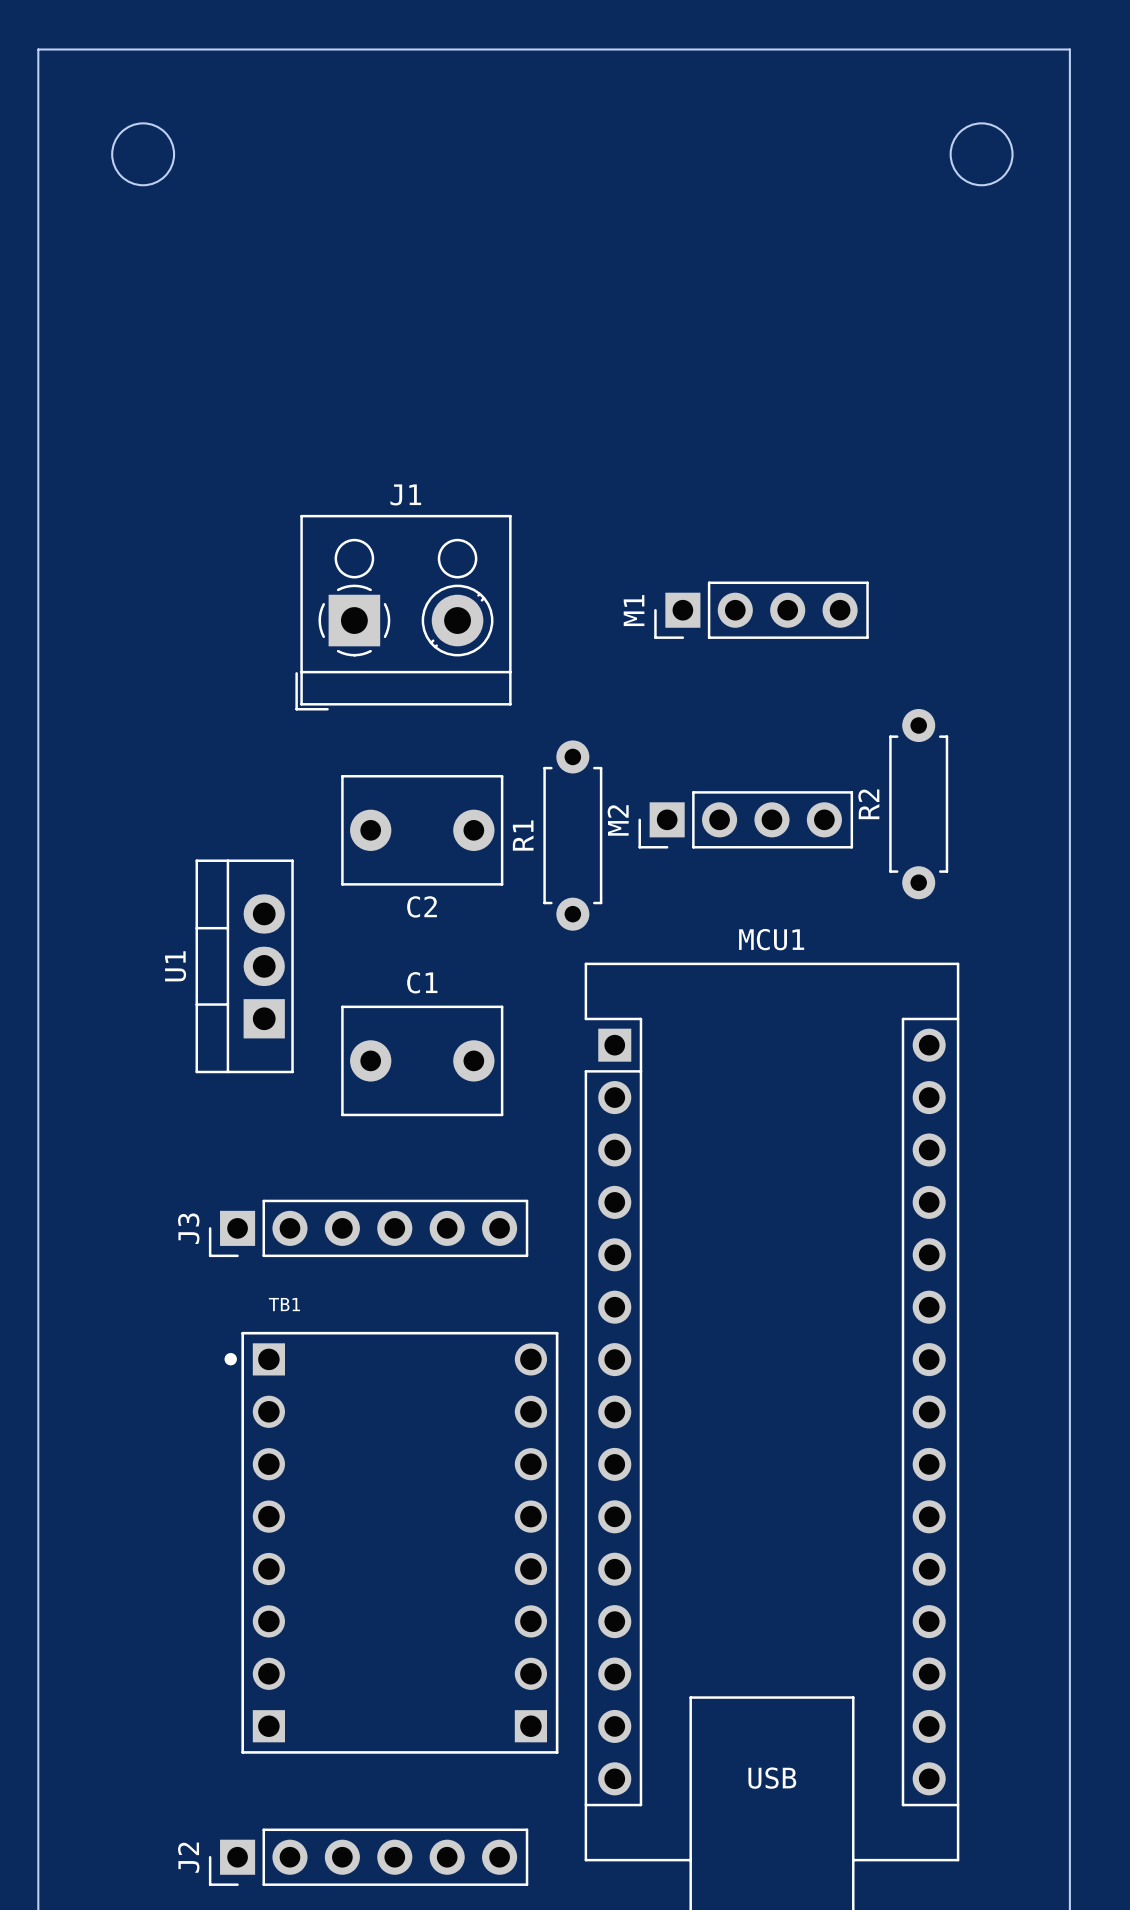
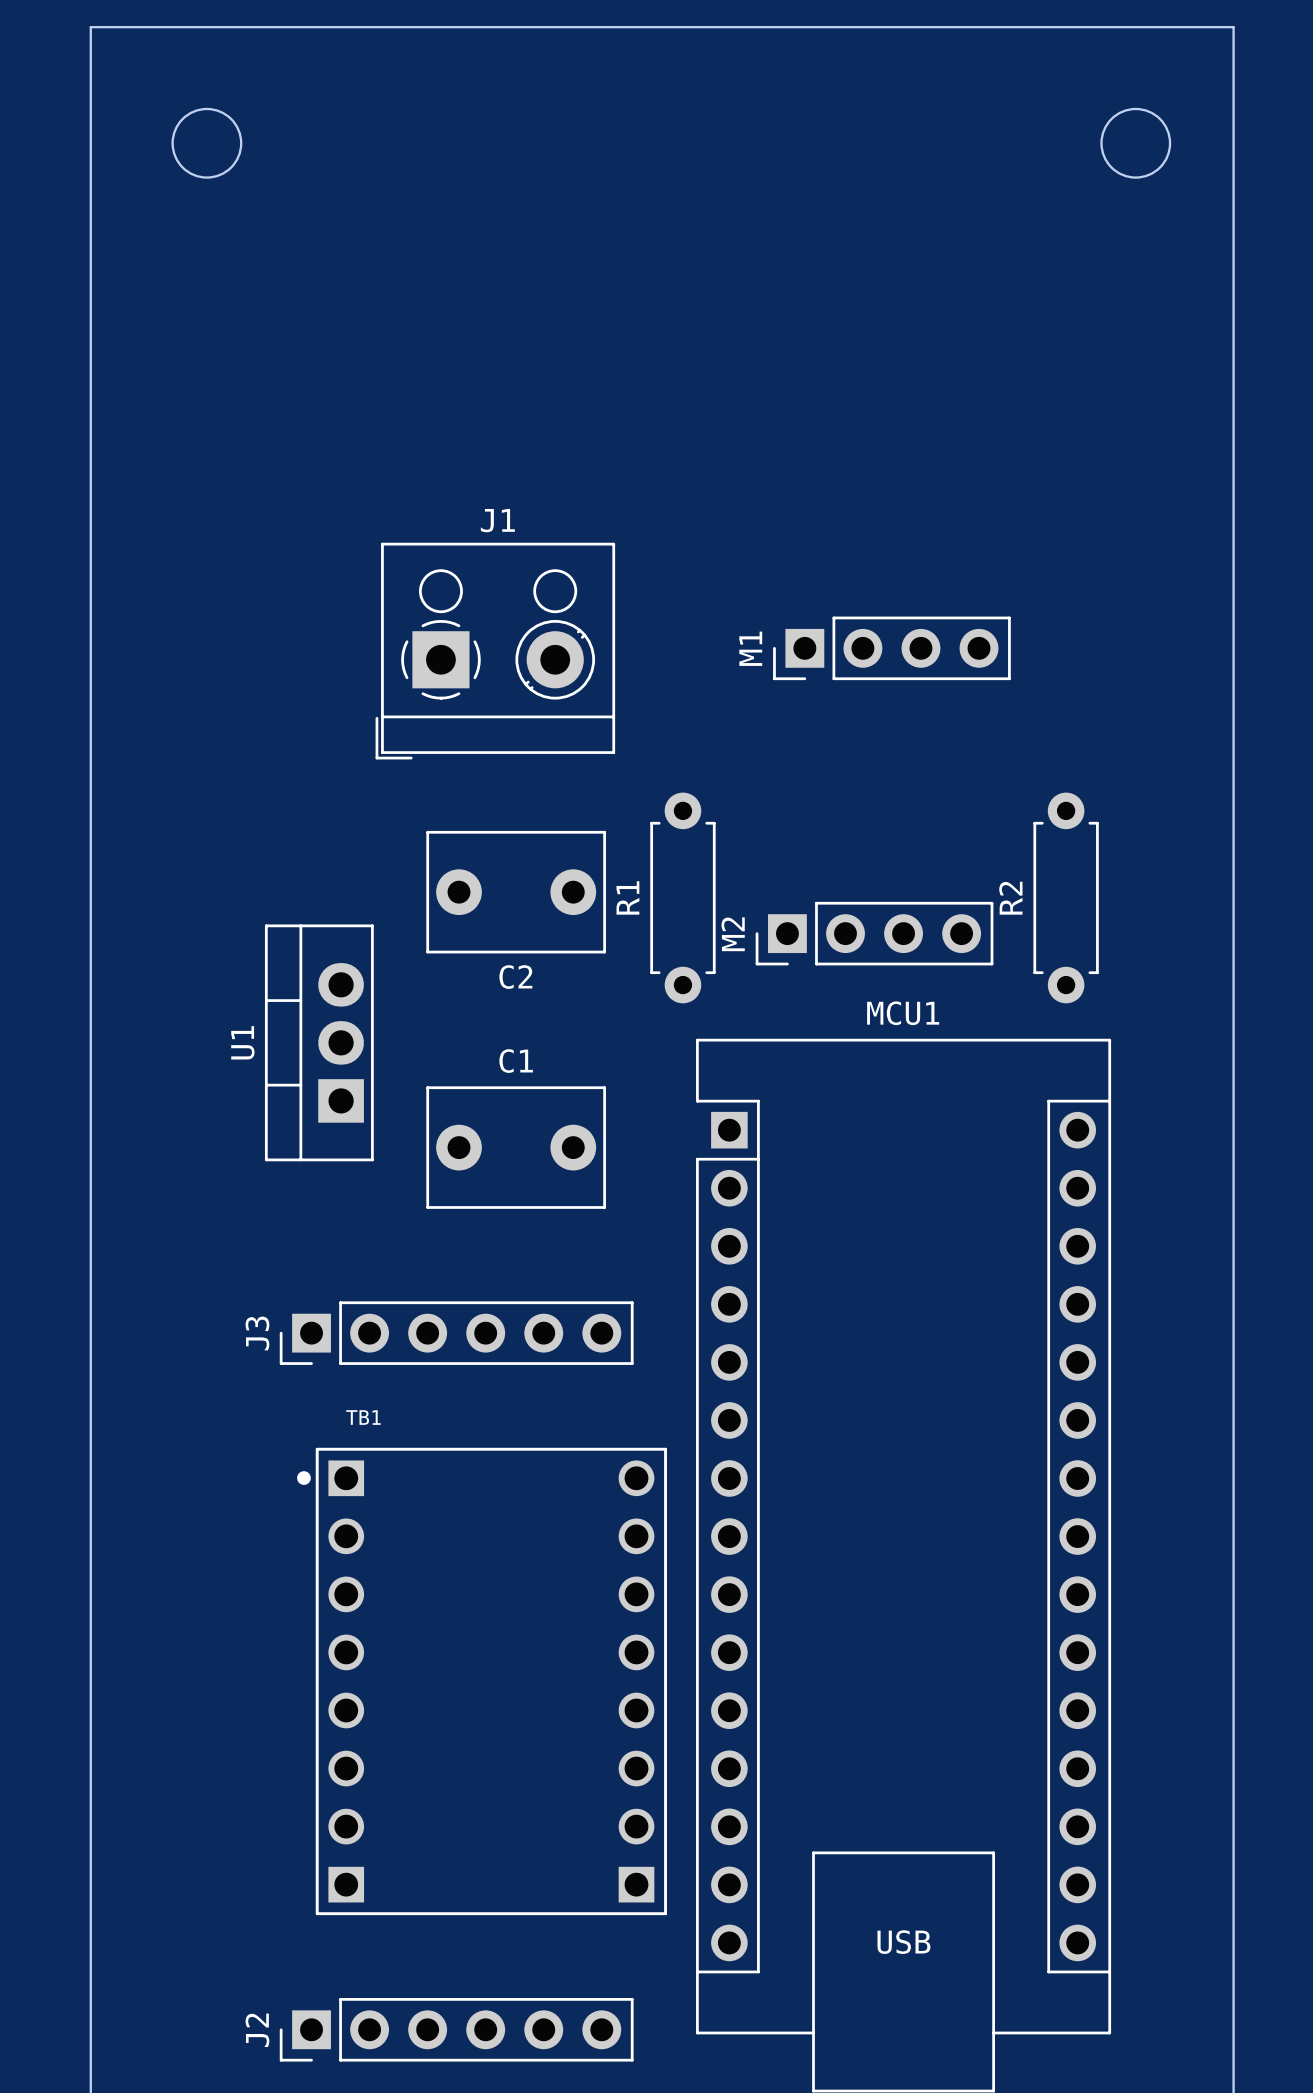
R2 position: (918, 804) -> (1066, 897)
M2 position: (745, 819) -> (874, 933)

